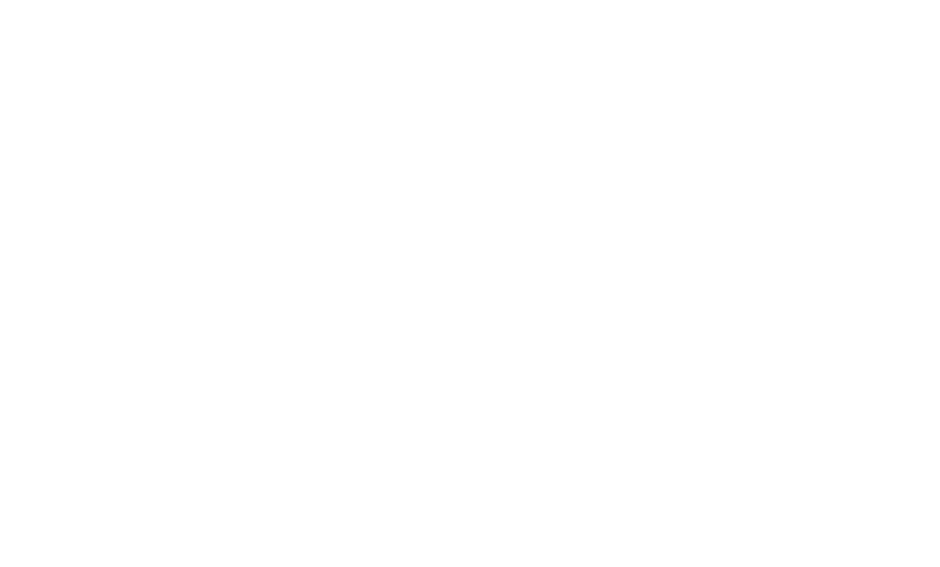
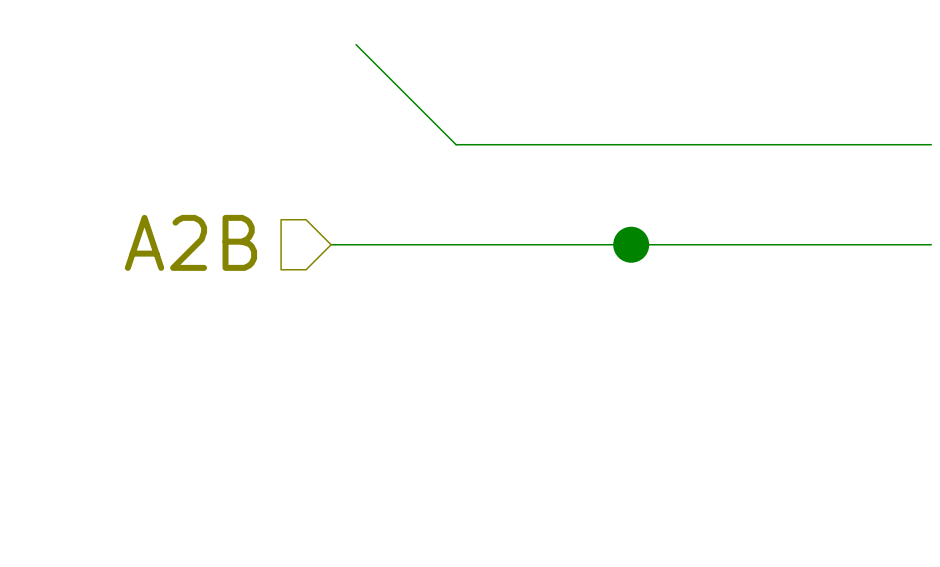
wire: none -> (356, 44) (456, 144) (931, 144)
hierarchical label: none -> A2B (190, 242)
wire: none -> (331, 244) (931, 244)
junction: none -> (631, 244)

